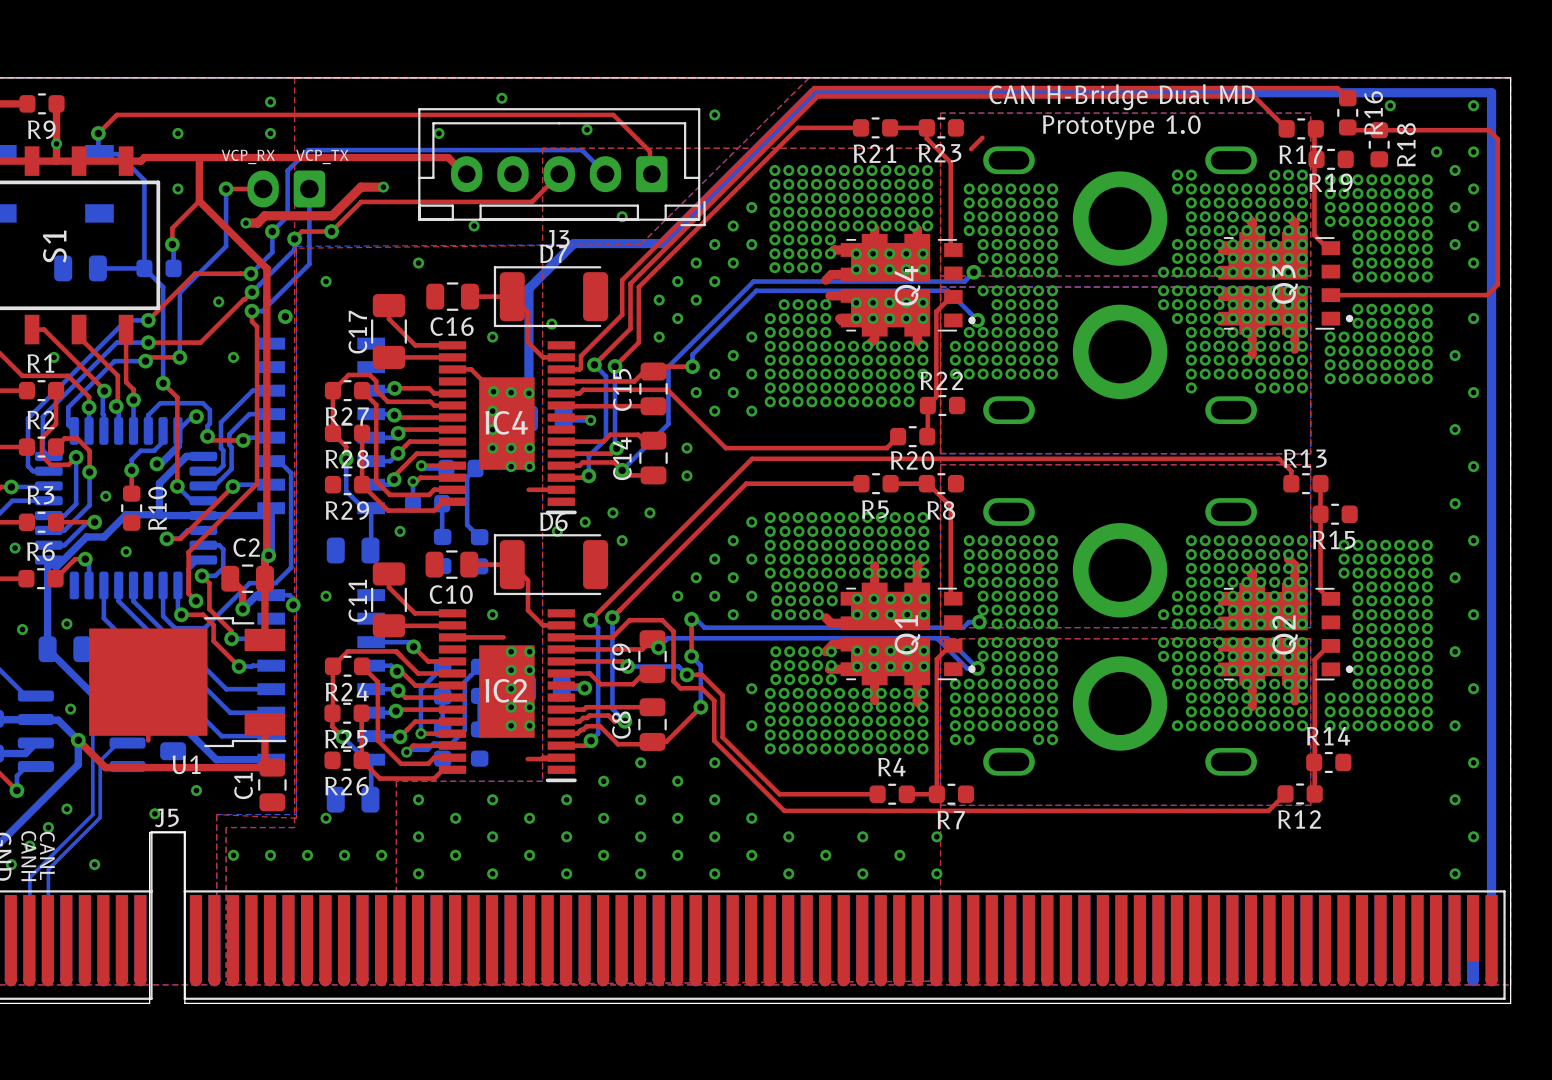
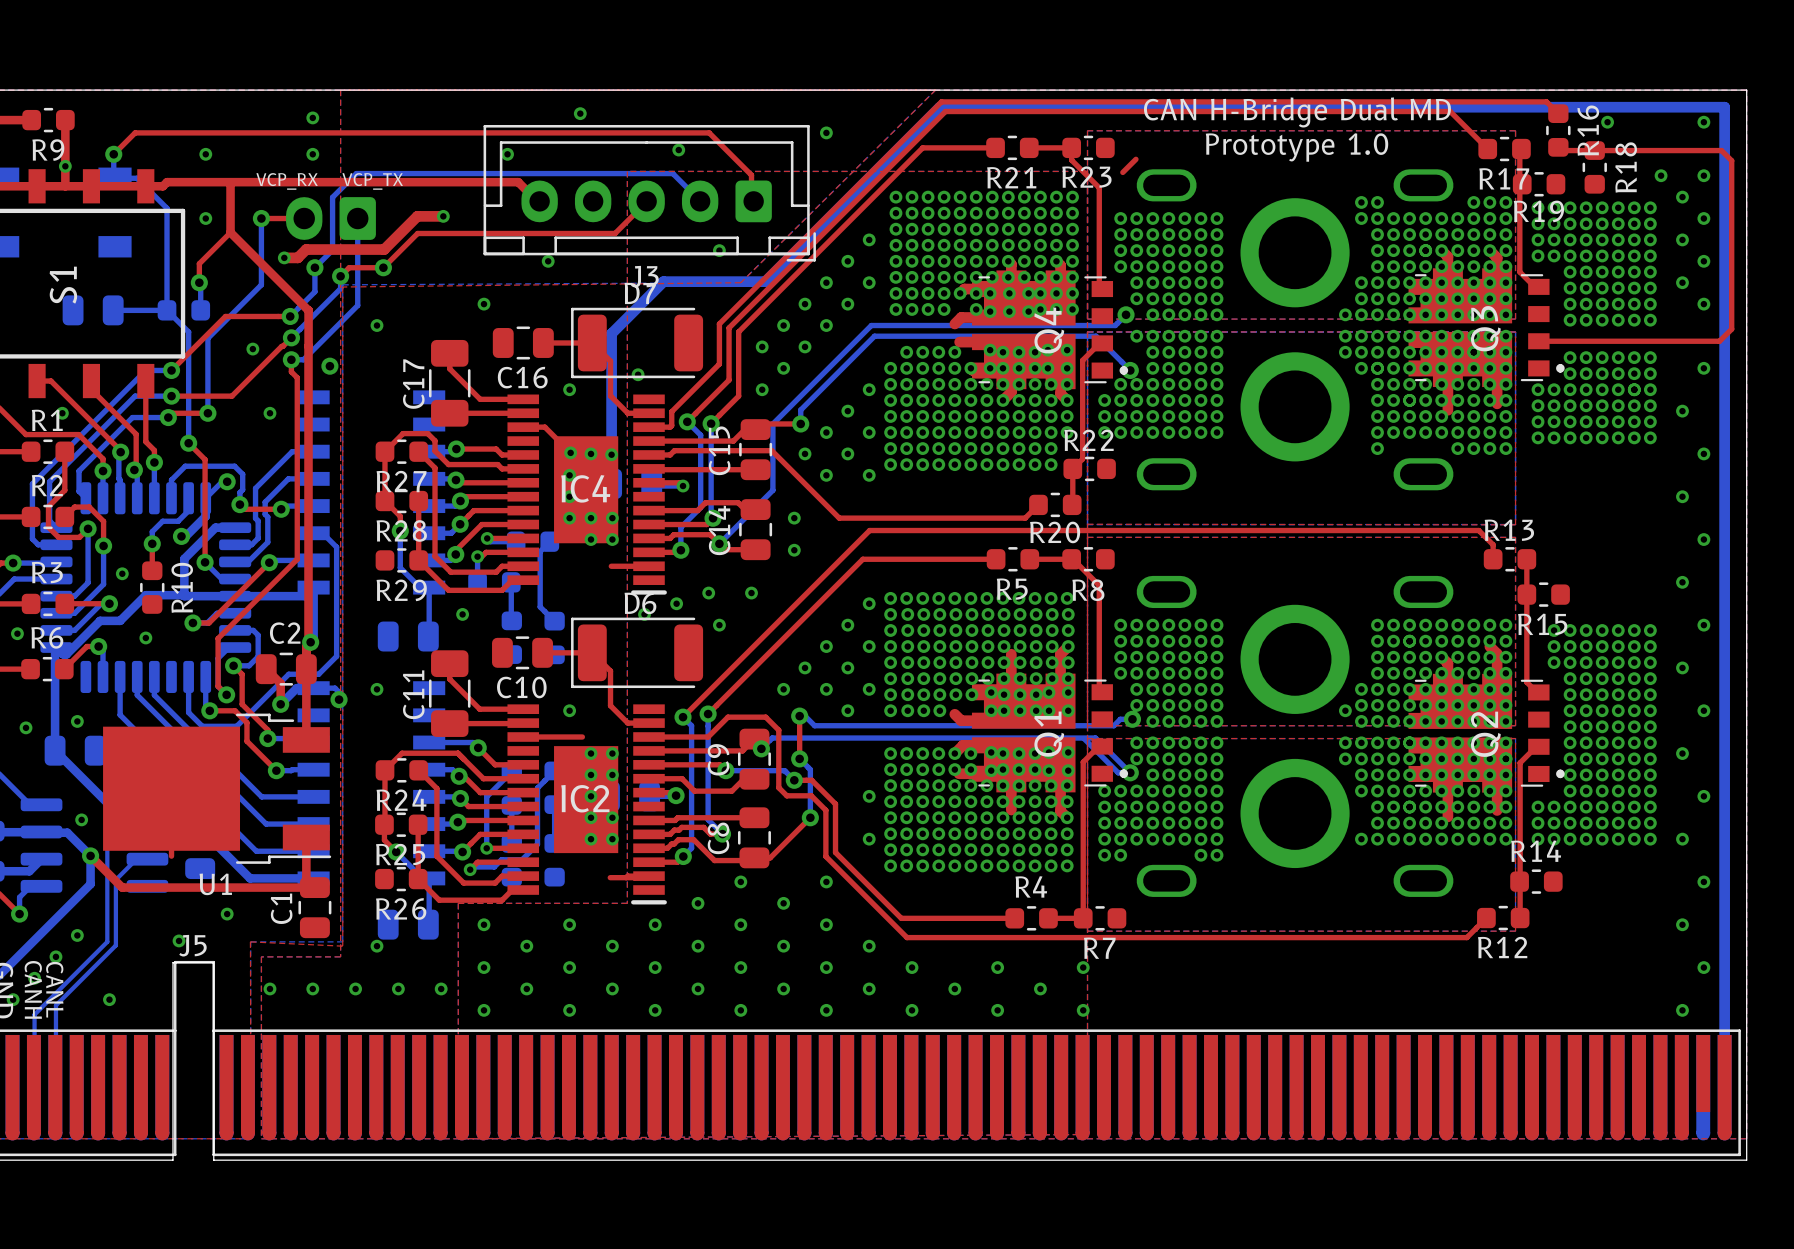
via: none -> (976, 277)
via: none -> (992, 277)
via: none -> (1008, 277)
via: none -> (1024, 277)
via: none -> (1040, 277)
via: none -> (1056, 277)
via: none -> (1072, 277)
via: none -> (976, 293)
via: none -> (1040, 293)
via: (906, 253) -> none
via: none -> (1056, 293)
via: (922, 253) -> none
via: none -> (1072, 293)
via: none -> (976, 309)
via: none -> (1040, 309)
via: none -> (1056, 309)
via: none -> (1072, 309)
via: (906, 269) -> none
via: (922, 269) -> none
via: (872, 302) -> none
via: (889, 302) -> none
via: none -> (1002, 352)
via: none -> (1019, 352)
via: none -> (1035, 352)
via: none -> (970, 368)
via: none -> (1002, 368)
via: (872, 318) -> none
via: none -> (1019, 368)
via: (889, 318) -> none
via: none -> (1035, 368)
via: none -> (970, 384)
via: none -> (986, 384)
via: none -> (1002, 384)
via: none -> (1019, 384)
via: none -> (1035, 384)
via: none -> (1051, 384)
via: none -> (1067, 384)
via: none -> (890, 678)
via: (776, 586) -> none
via: none -> (907, 678)
via: (790, 586) -> none
via: none -> (923, 678)
via: (804, 586) -> none
via: none -> (939, 678)
via: (818, 586) -> none
via: none -> (955, 678)
via: (832, 586) -> none
via: none -> (971, 678)
via: none -> (988, 678)
via: none -> (1004, 678)
via: none -> (1020, 678)
via: none -> (1036, 678)
via: none -> (1052, 678)
via: none -> (1068, 678)
via: (873, 598) -> none
via: (890, 598) -> none
via: none -> (890, 694)
via: (776, 600) -> none
via: none -> (907, 694)
via: (790, 600) -> none
via: none -> (923, 694)
via: (804, 600) -> none
via: none -> (939, 694)
via: (818, 600) -> none
via: none -> (955, 694)
via: (832, 600) -> none
via: none -> (971, 694)
via: none -> (1004, 694)
via: none -> (1020, 694)
via: none -> (1036, 694)
via: none -> (890, 710)
via: (776, 614) -> none
via: none -> (907, 710)
via: (790, 614) -> none
via: none -> (923, 710)
via: (804, 614) -> none
via: none -> (939, 710)
via: (818, 614) -> none
via: none -> (1004, 710)
via: (873, 614) -> none
via: none -> (1020, 710)
via: (890, 614) -> none
via: none -> (1036, 710)
via: (873, 650) -> none
via: (890, 650) -> none
via: none -> (890, 753)
via: (775, 651) -> none
via: none -> (906, 753)
via: (789, 651) -> none
via: none -> (922, 753)
via: (803, 651) -> none
via: none -> (938, 753)
via: (817, 651) -> none
via: none -> (954, 753)
via: (831, 651) -> none
via: none -> (970, 753)
via: none -> (1002, 753)
via: none -> (1019, 753)
via: none -> (1035, 753)
via: none -> (890, 769)
via: (775, 665) -> none
via: none -> (906, 769)
via: (789, 665) -> none
via: none -> (922, 769)
via: (803, 665) -> none
via: none -> (938, 769)
via: (817, 665) -> none
via: none -> (954, 769)
via: (831, 665) -> none
via: none -> (970, 769)
via: none -> (1002, 769)
via: none -> (1019, 769)
via: none -> (1035, 769)
via: (873, 666) -> none
via: (890, 666) -> none
via: none -> (890, 785)
via: (775, 679) -> none
via: none -> (906, 785)
via: (789, 679) -> none
via: none -> (922, 785)
via: (803, 679) -> none
via: none -> (938, 785)
via: (817, 679) -> none
via: none -> (954, 785)
via: (831, 679) -> none
via: none -> (970, 785)
via: none -> (986, 785)
via: none -> (1002, 785)
via: none -> (1019, 785)
via: none -> (1035, 785)
via: none -> (1051, 785)
via: none -> (1067, 785)

